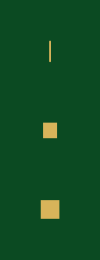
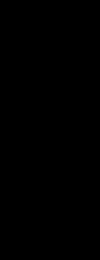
part: (50, 51) -> none
part: (50, 130) -> none
part: (50, 209) -> none

